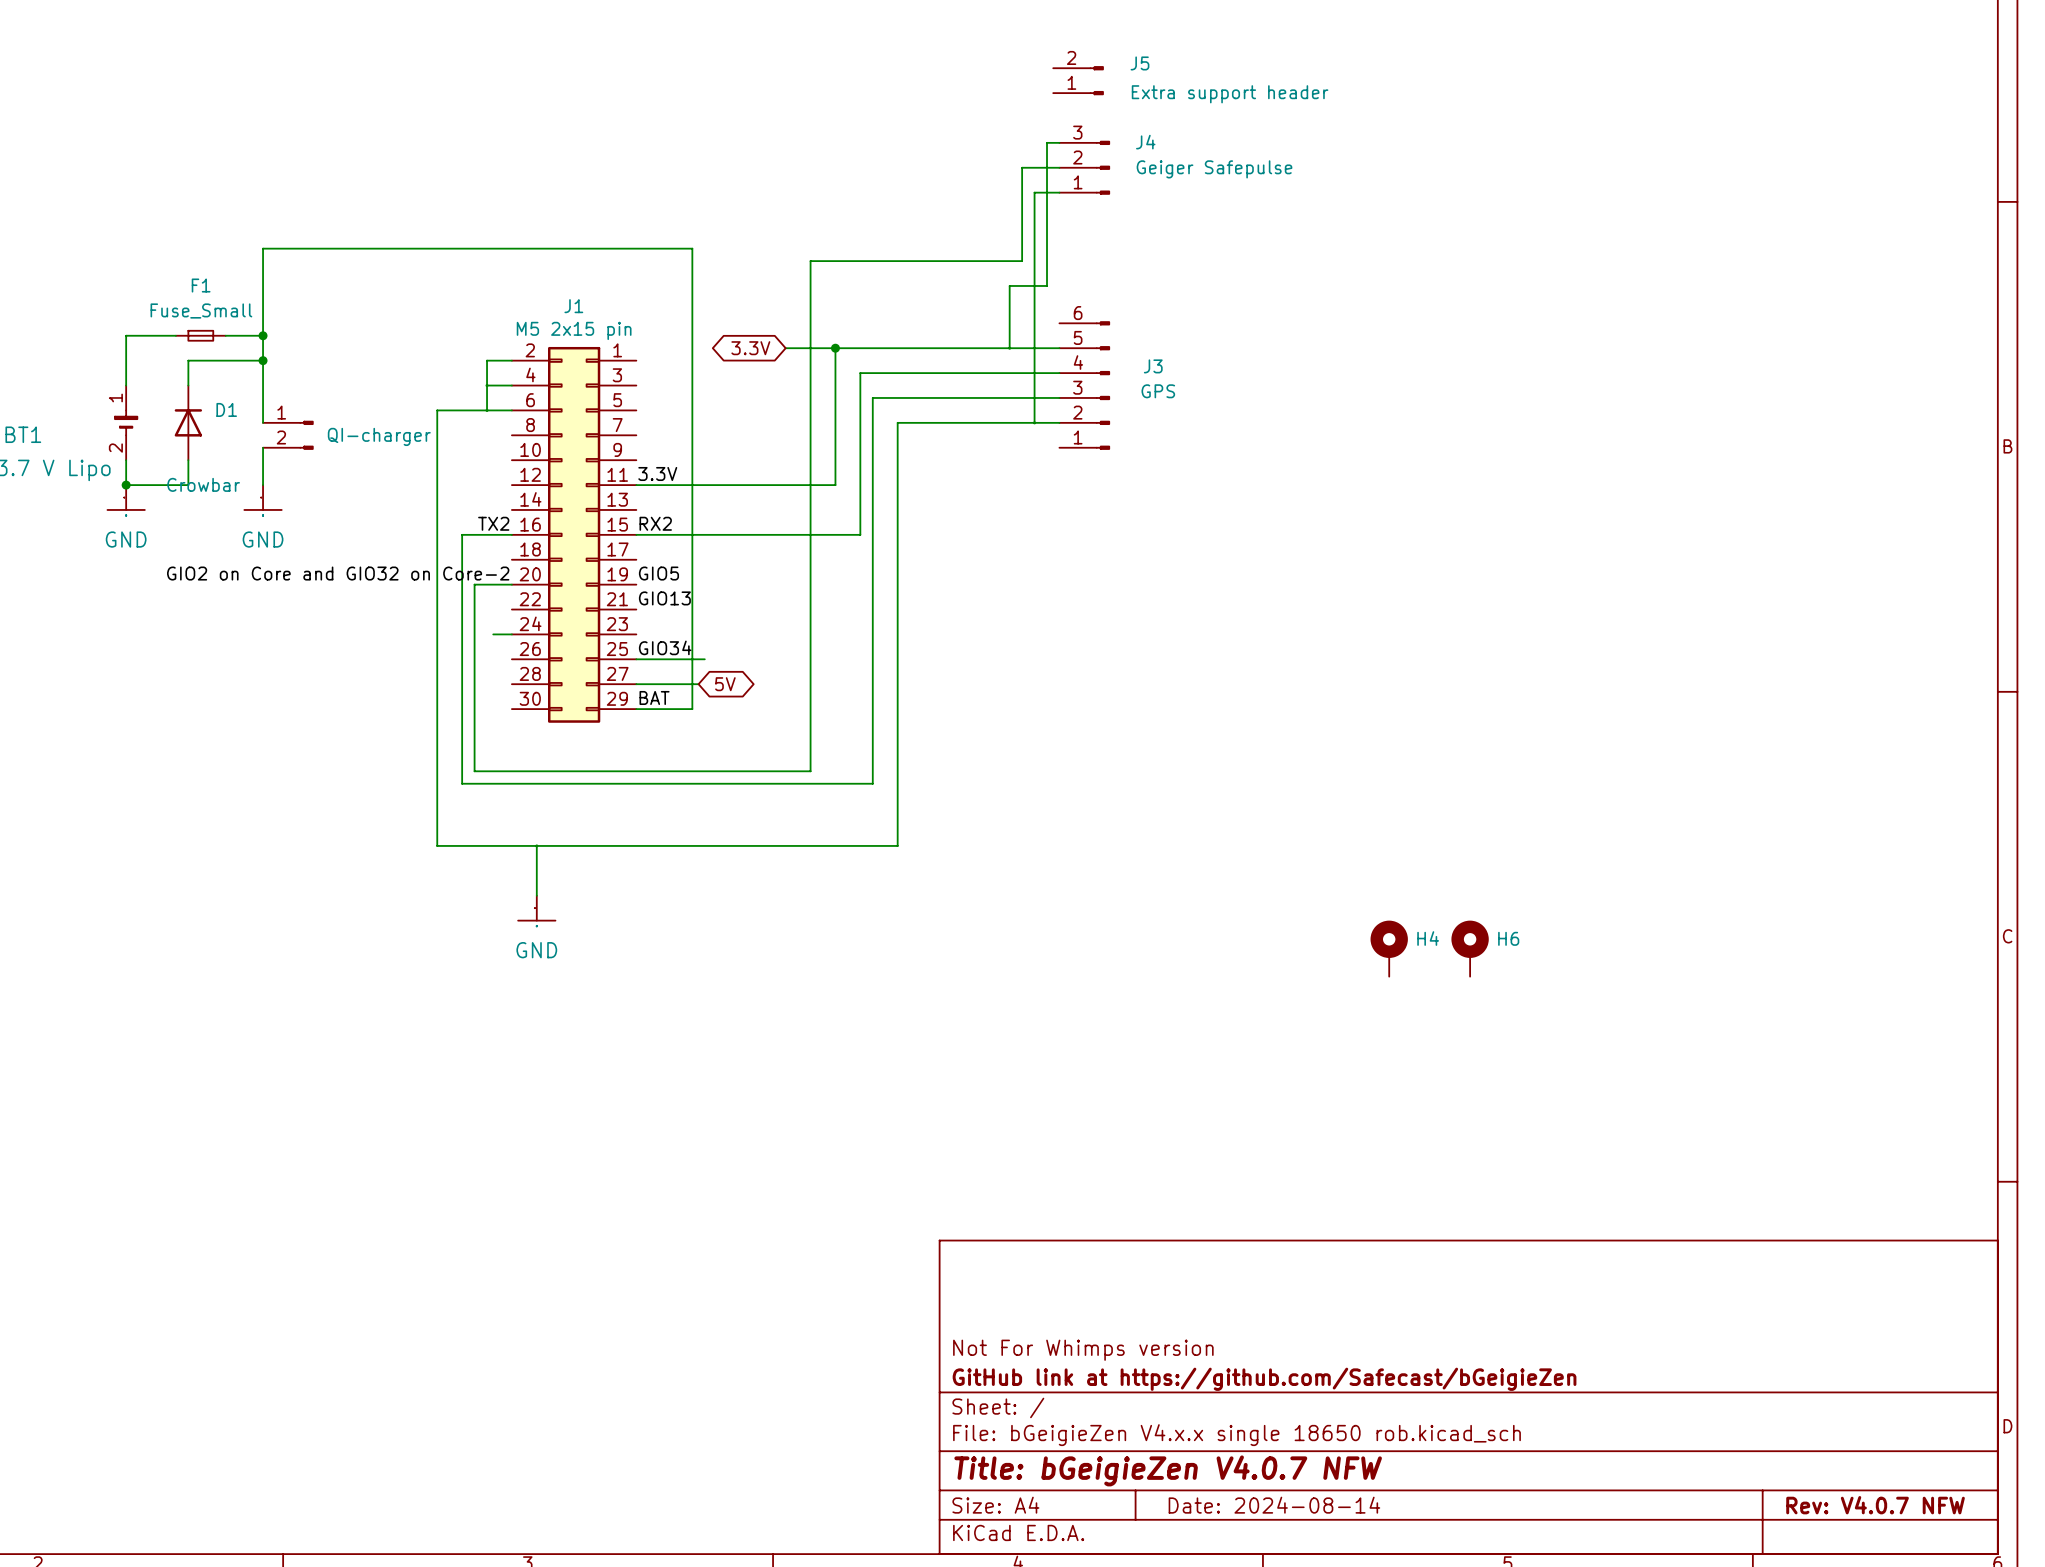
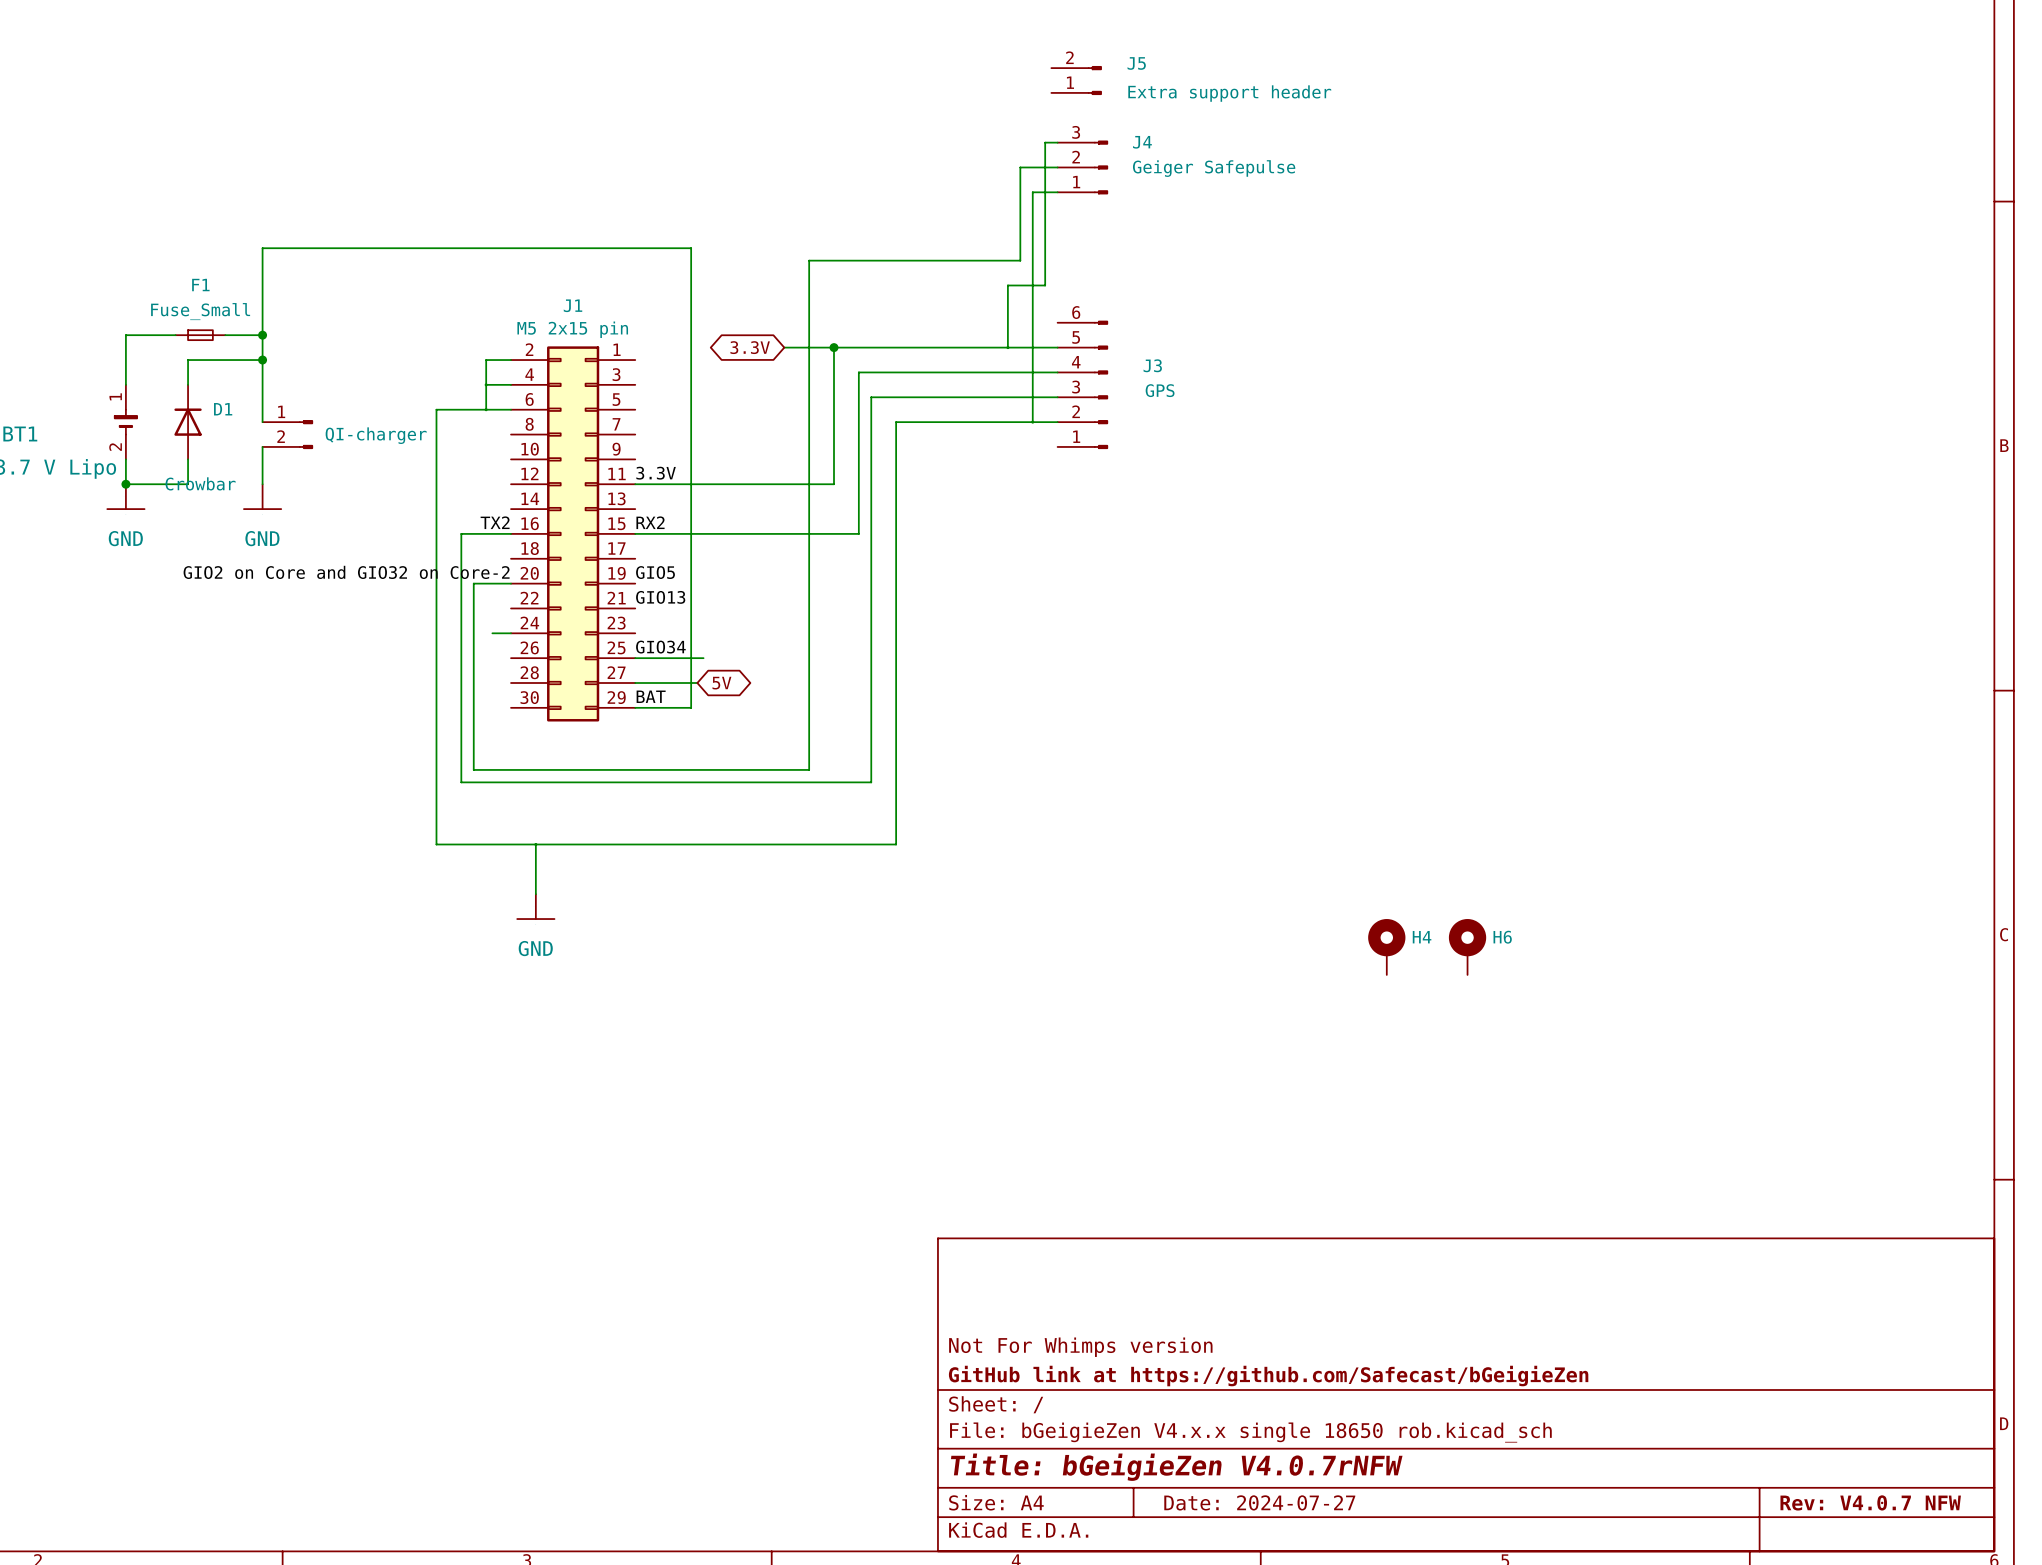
title block: Title: bGeigieZen V4.0.7 NFW (1168, 1470) -> Title: bGeigieZen V4.0.7rNFW (1176, 1467)
title block: Date: 2024-08-14 (1274, 1505) -> Date: 2024-07-27 (1259, 1502)

